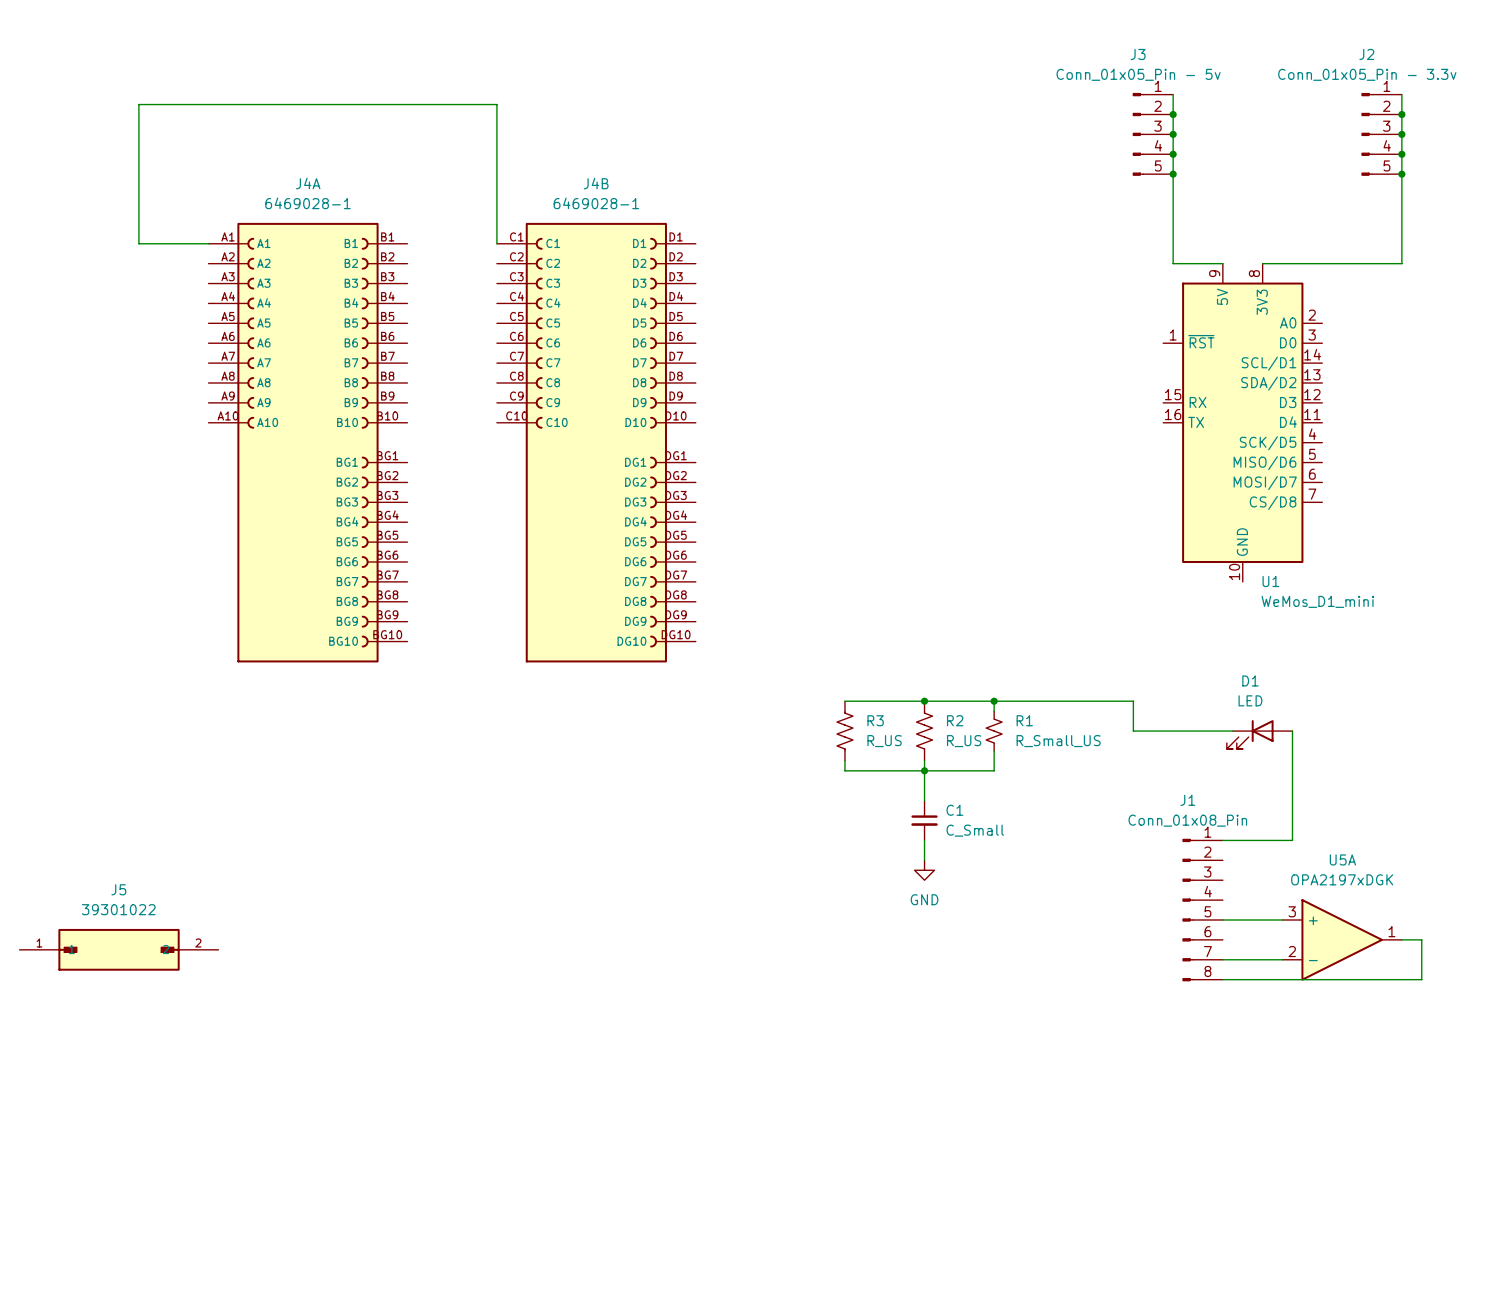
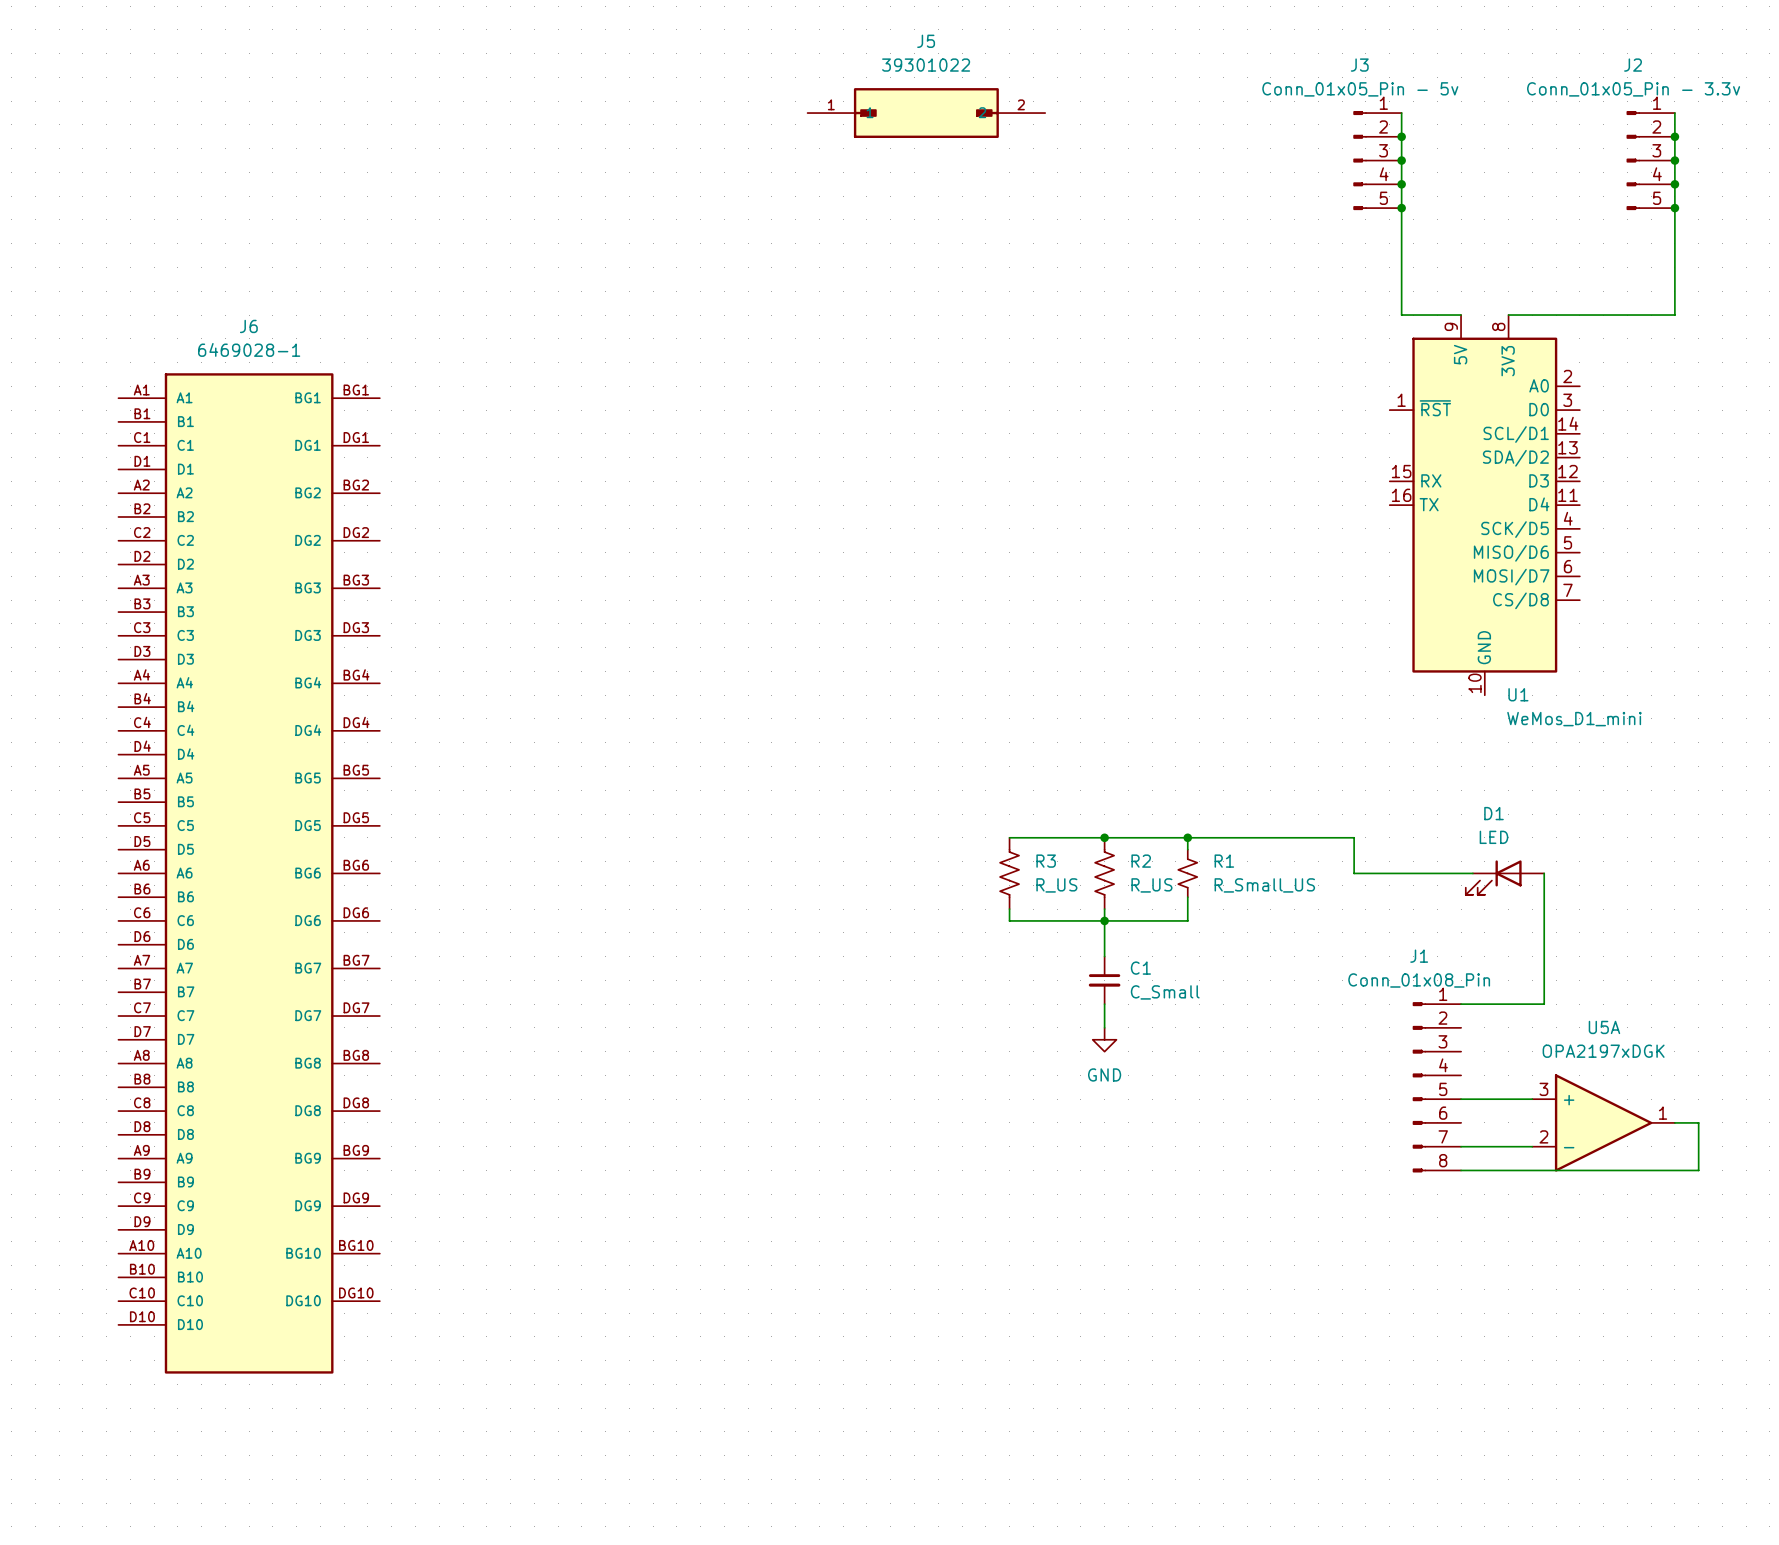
wire: (208, 243) (138, 243) (138, 104) (496, 104) (496, 243) -> none
J4A: 6469028-1 (307, 442) -> none
J4B: 6469028-1 (596, 442) -> none
J6: none -> 6469028-1 (249, 873)
J5 position: (119, 949) -> (926, 113)

